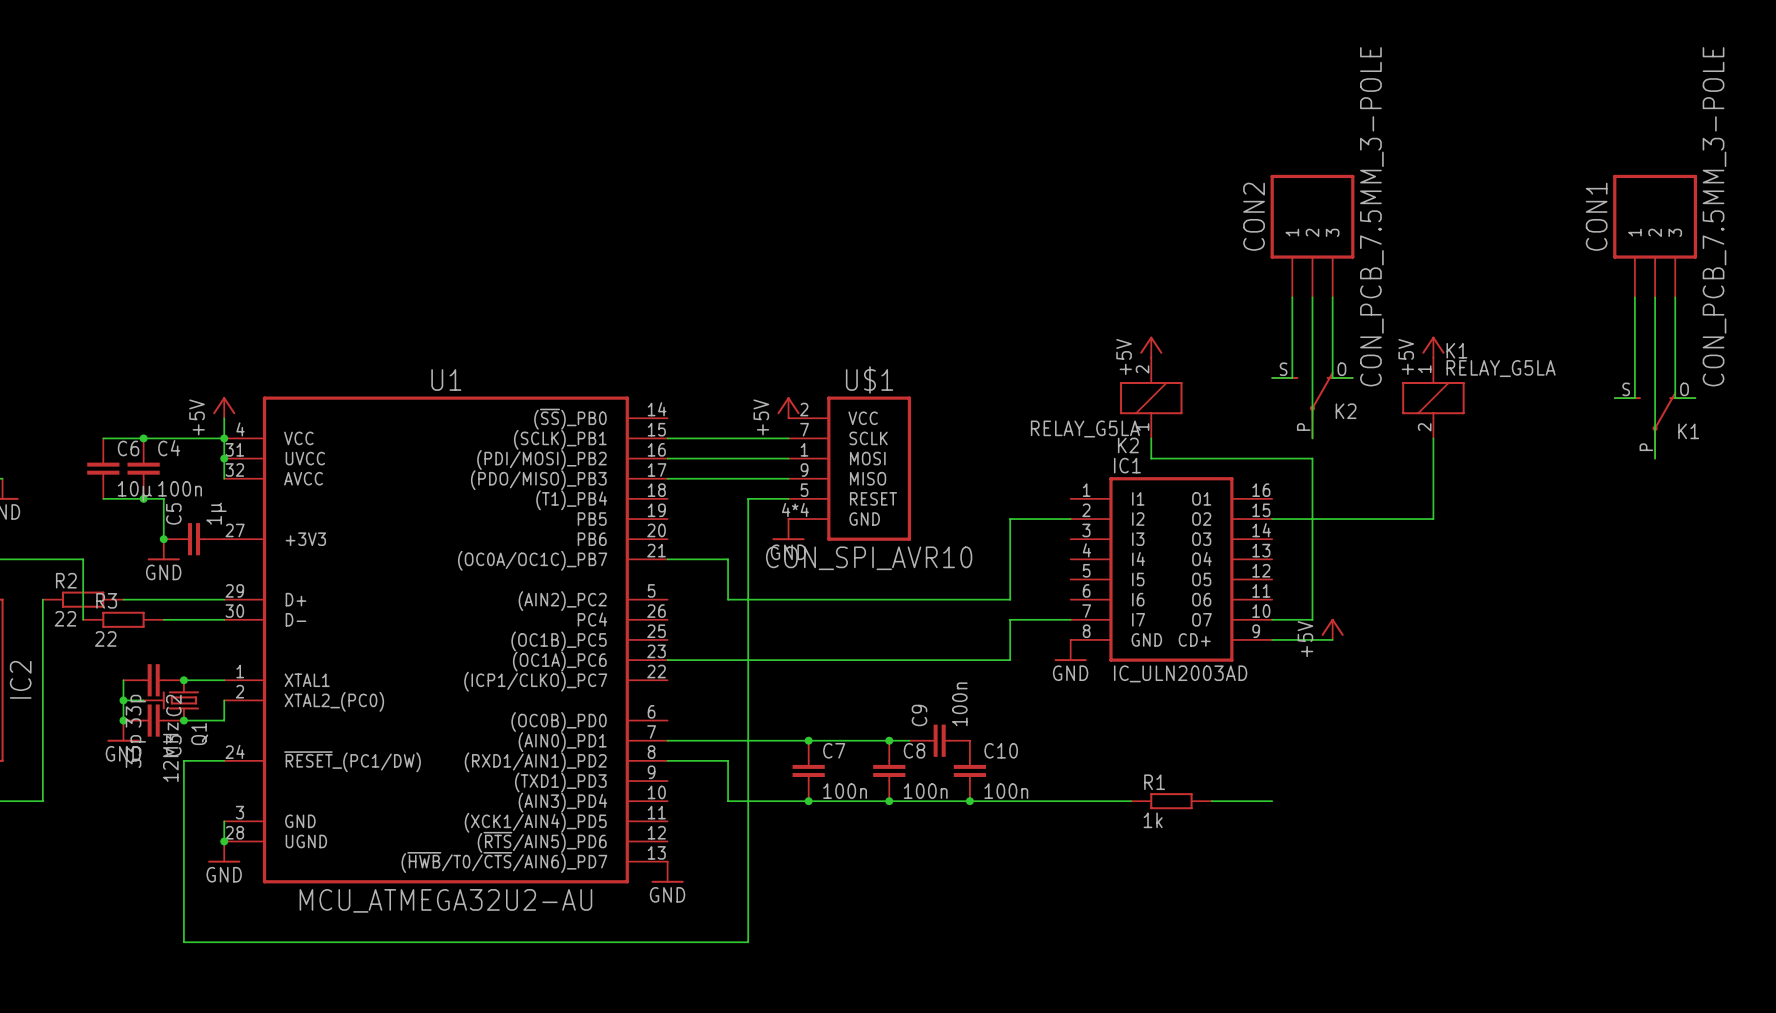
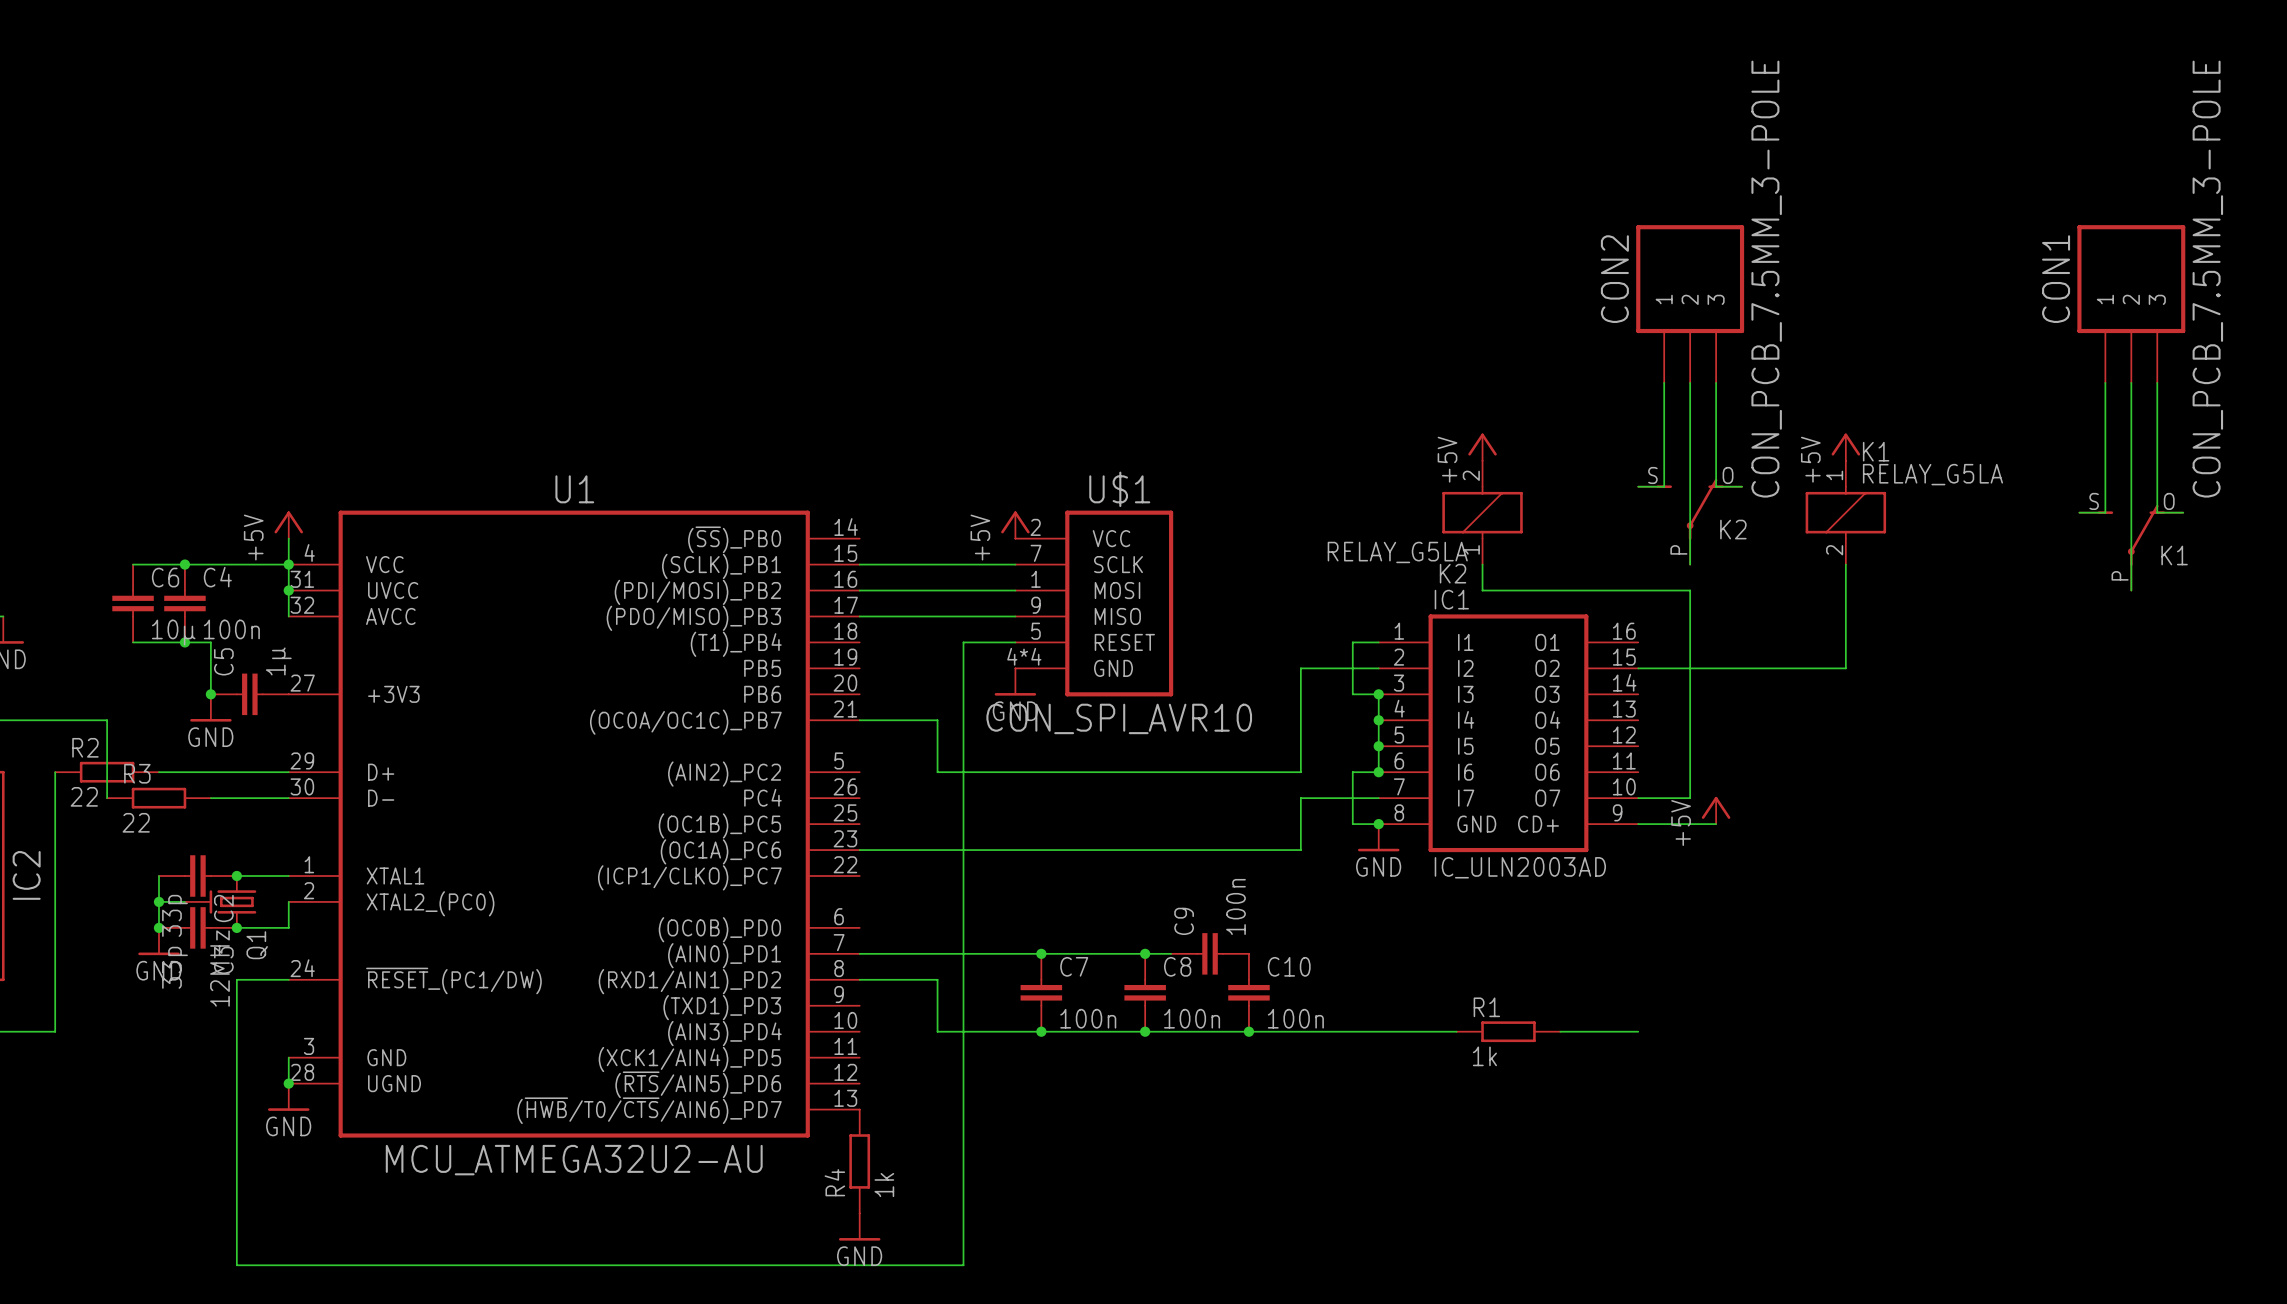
wire: none -> (1378, 642) (1352, 642) (1352, 694) (1378, 694) (1378, 772) (1352, 772) (1352, 824) (1378, 824)
junction: none -> (1378, 694)
junction: none -> (1378, 720)
junction: none -> (1378, 746)
junction: none -> (1378, 772)
junction: none -> (1378, 824)
power symbol position: GND (667, 872) -> GND (859, 1226)
R4: none -> 1k (859, 1161)
wire: (183, 942) (748, 942) -> (236, 1213) (236, 1265) (963, 1265) (963, 1213)

